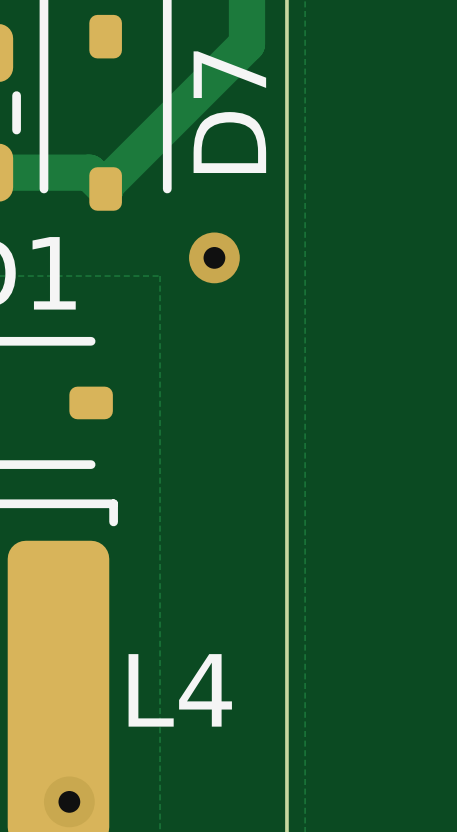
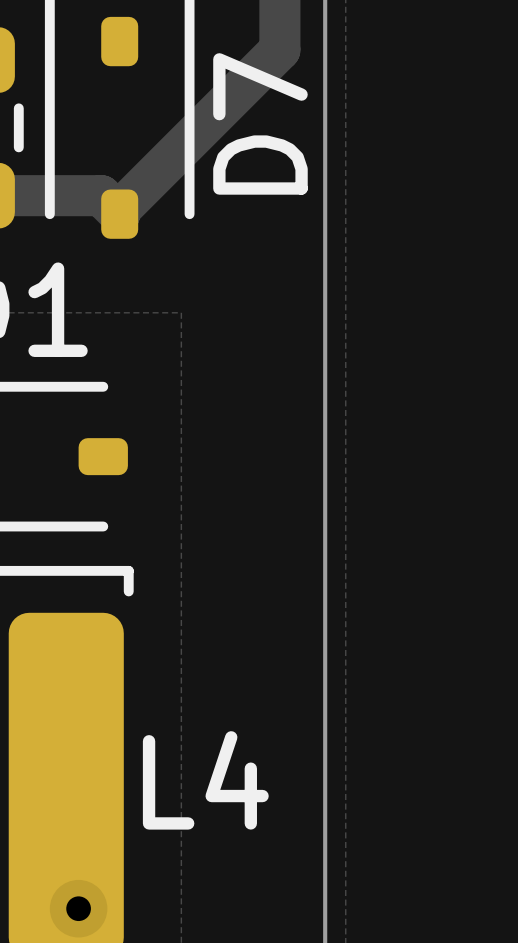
via: (214, 257) -> none

